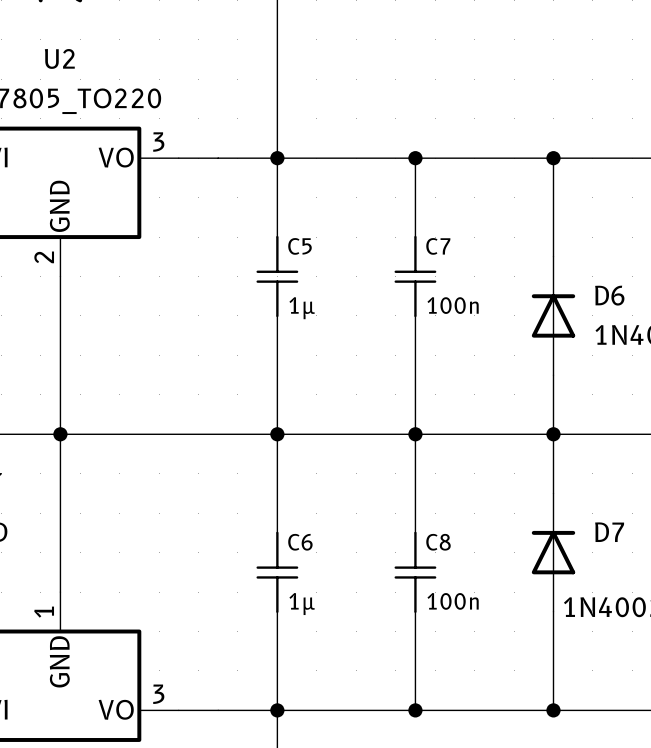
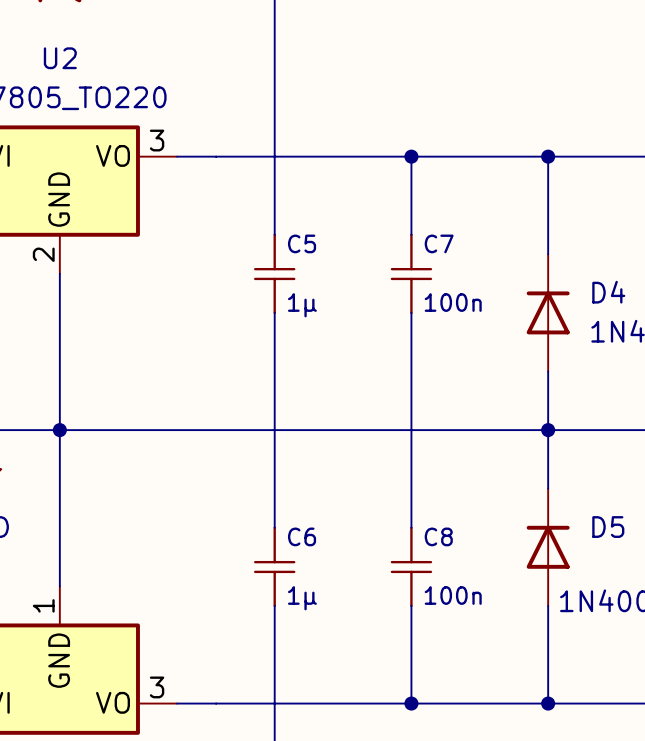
junction: (277, 158) -> none
D6 name: D6 (609, 295) -> D4 (608, 292)
junction: (277, 434) -> none
junction: (415, 434) -> none
D7 name: D7 (609, 532) -> D5 (608, 527)
junction: (277, 710) -> none

